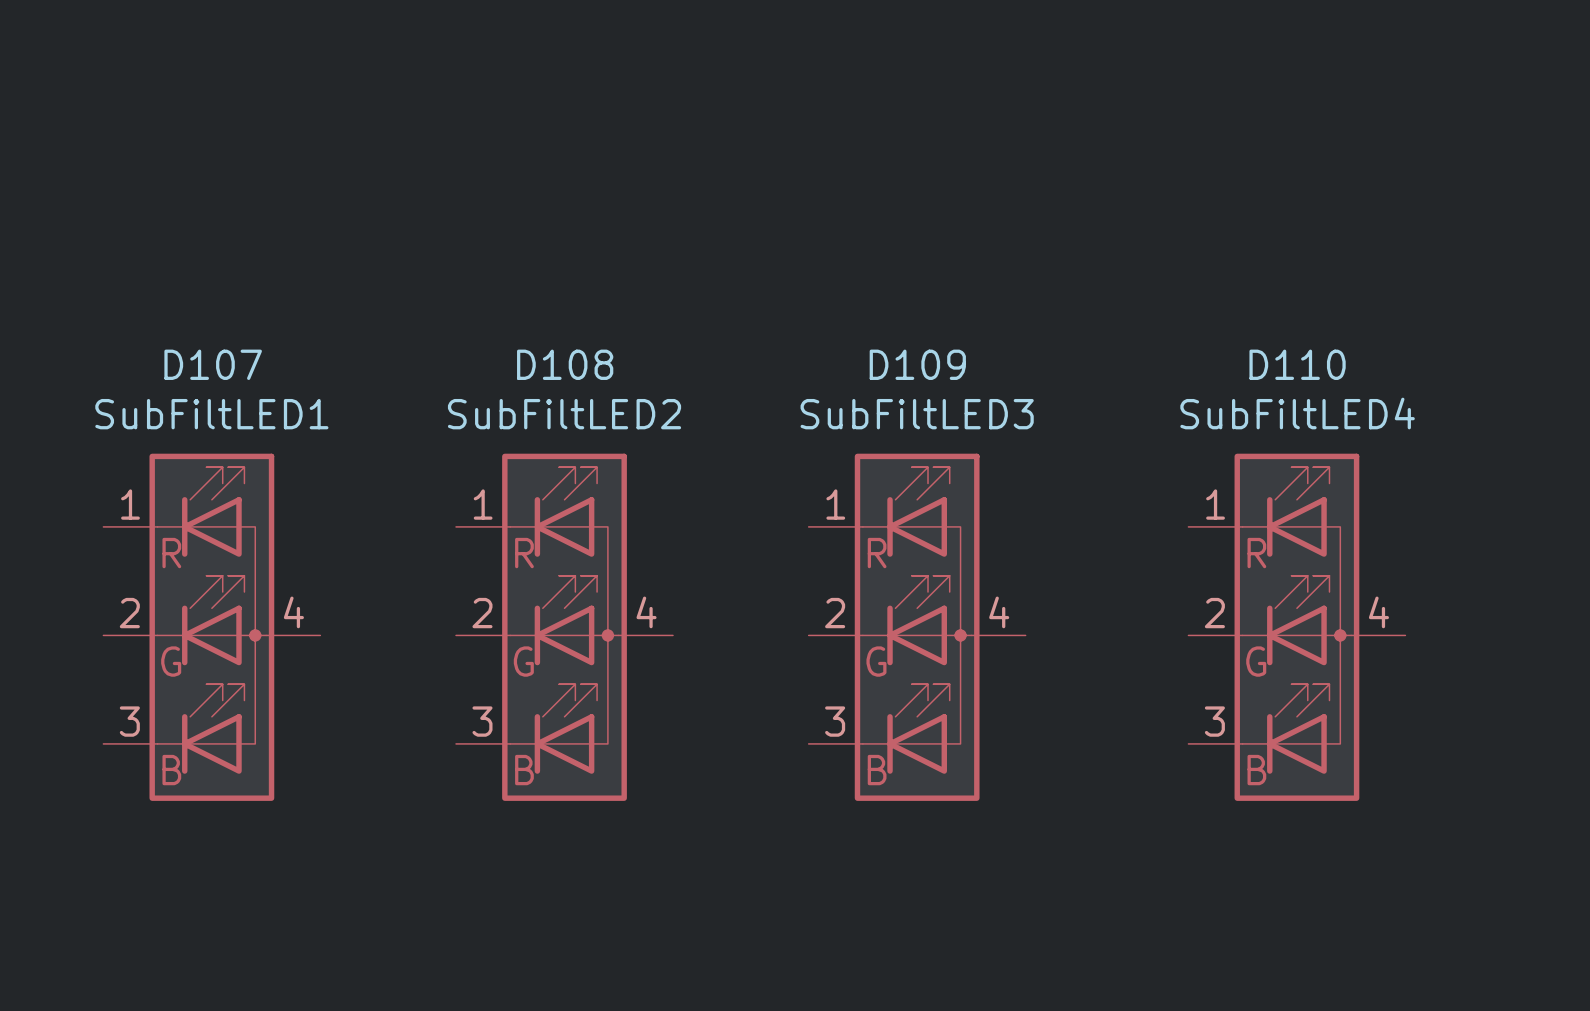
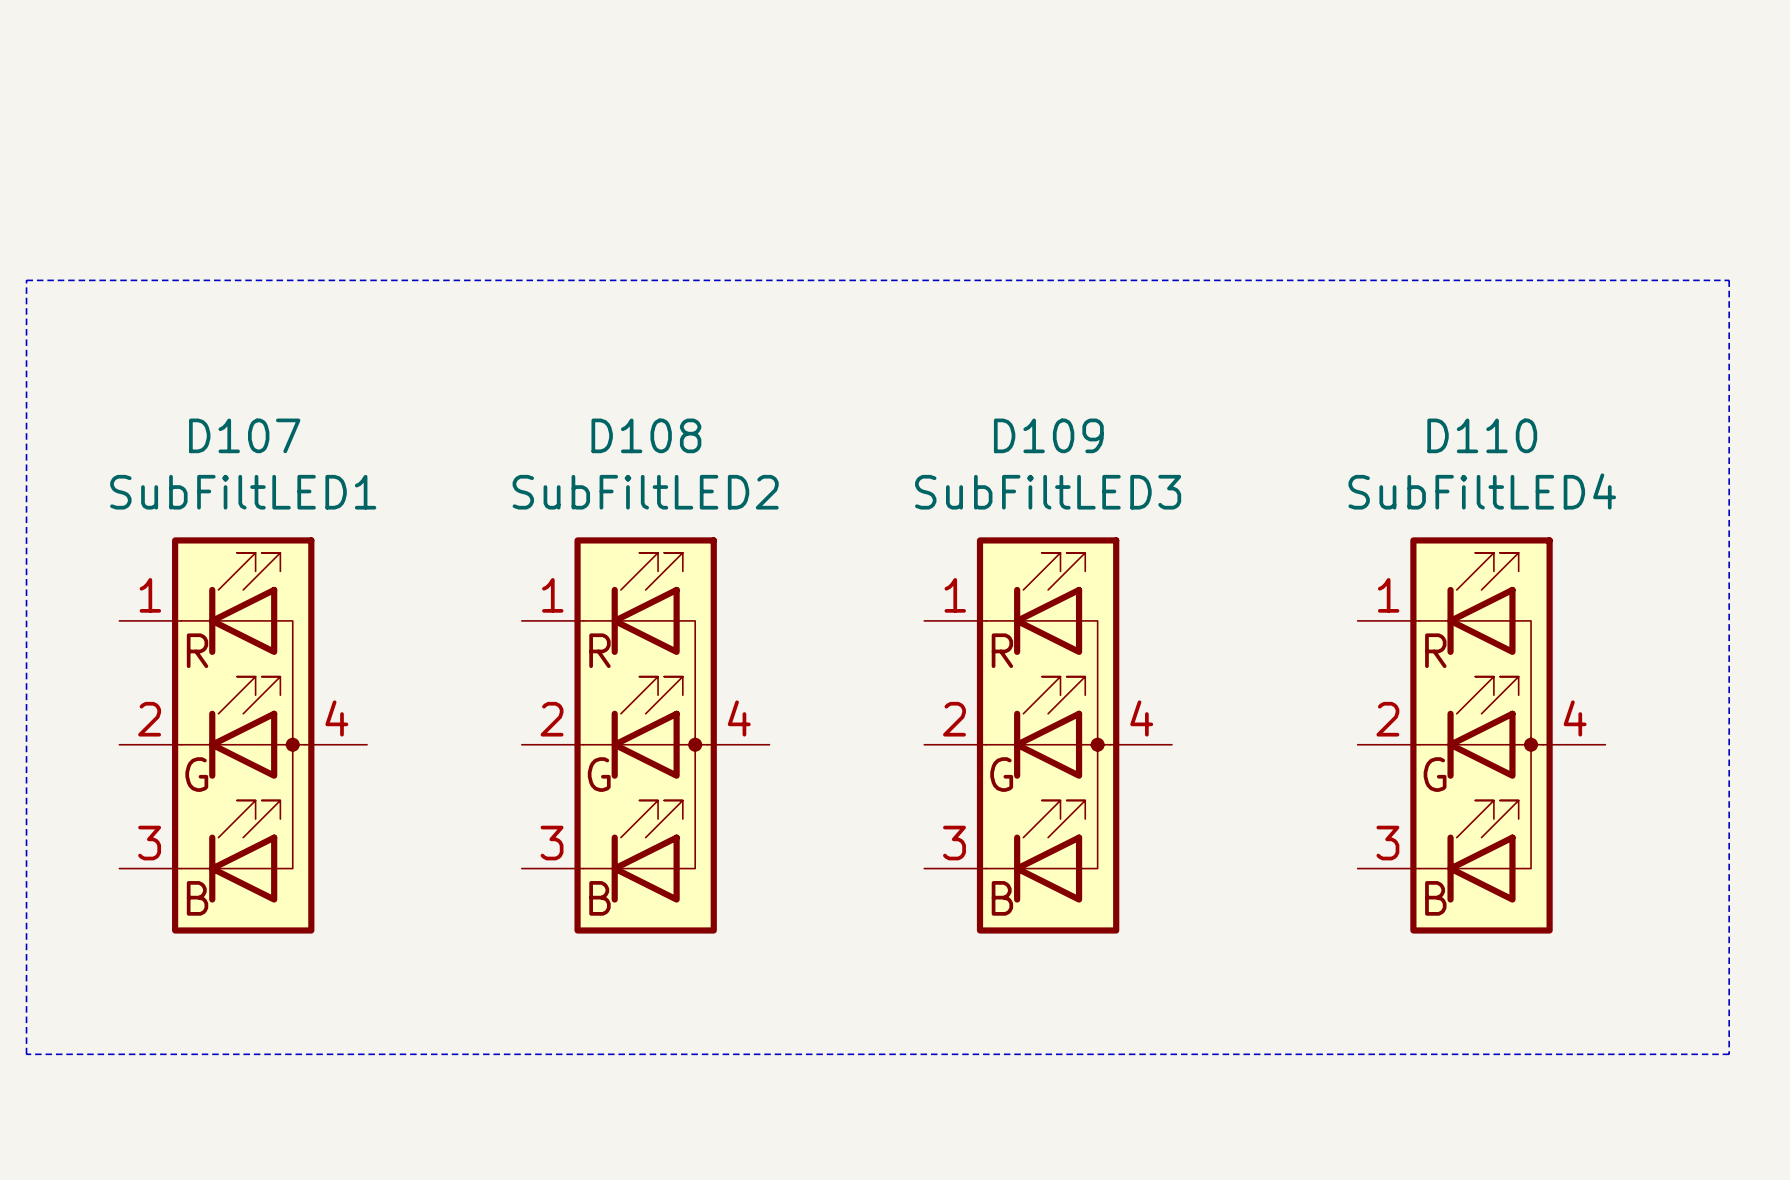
line: none -> (26, 280) (1729, 280) (1729, 1054) (26, 1054) (26, 280)

